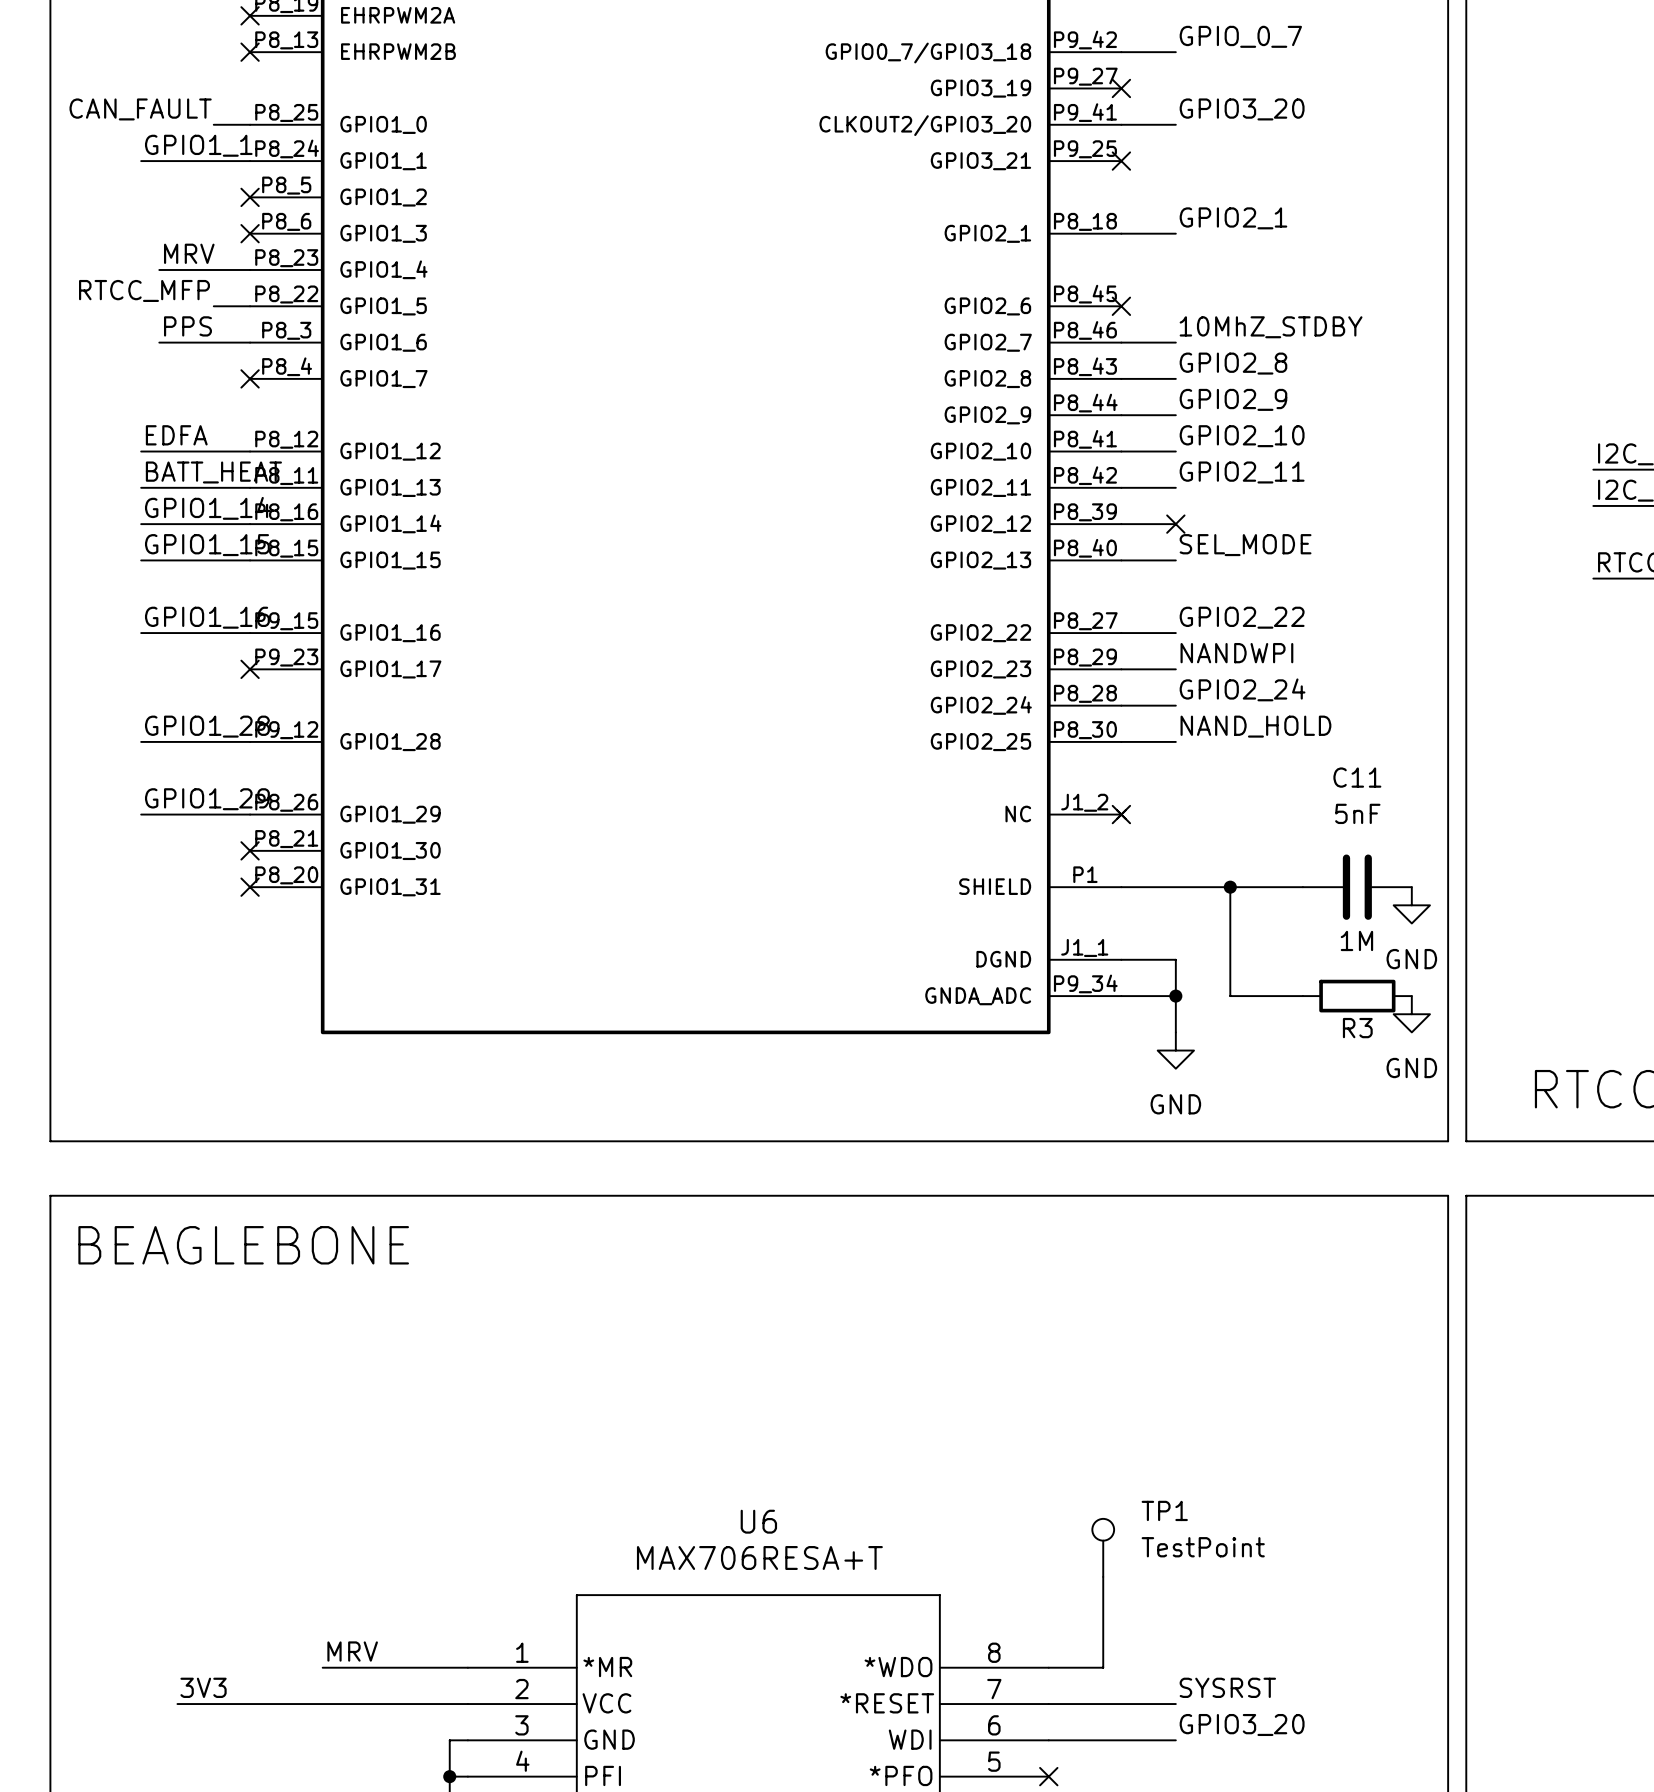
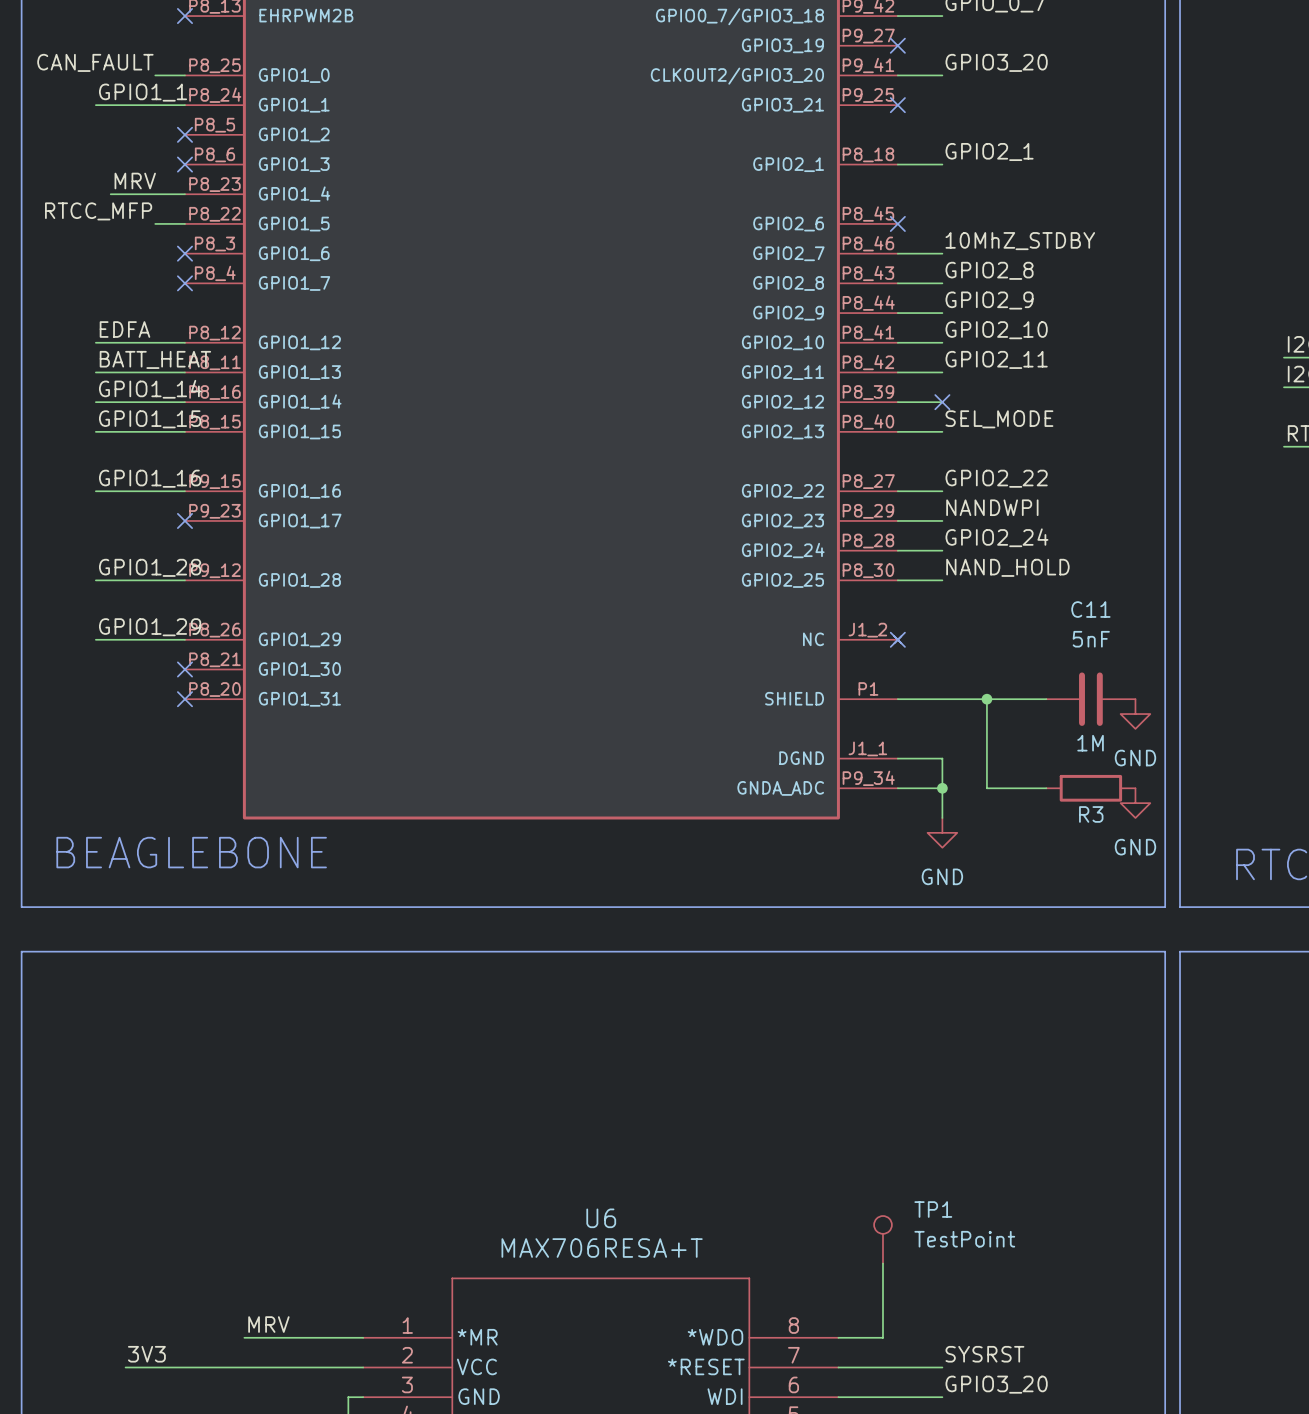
label: PPS (187, 326) -> none
wire: (159, 342) (250, 342) -> none
no-connect mark: none -> (184, 253)
text position: BEAGLEBONE (243, 1245) -> BEAGLEBONE (191, 852)

